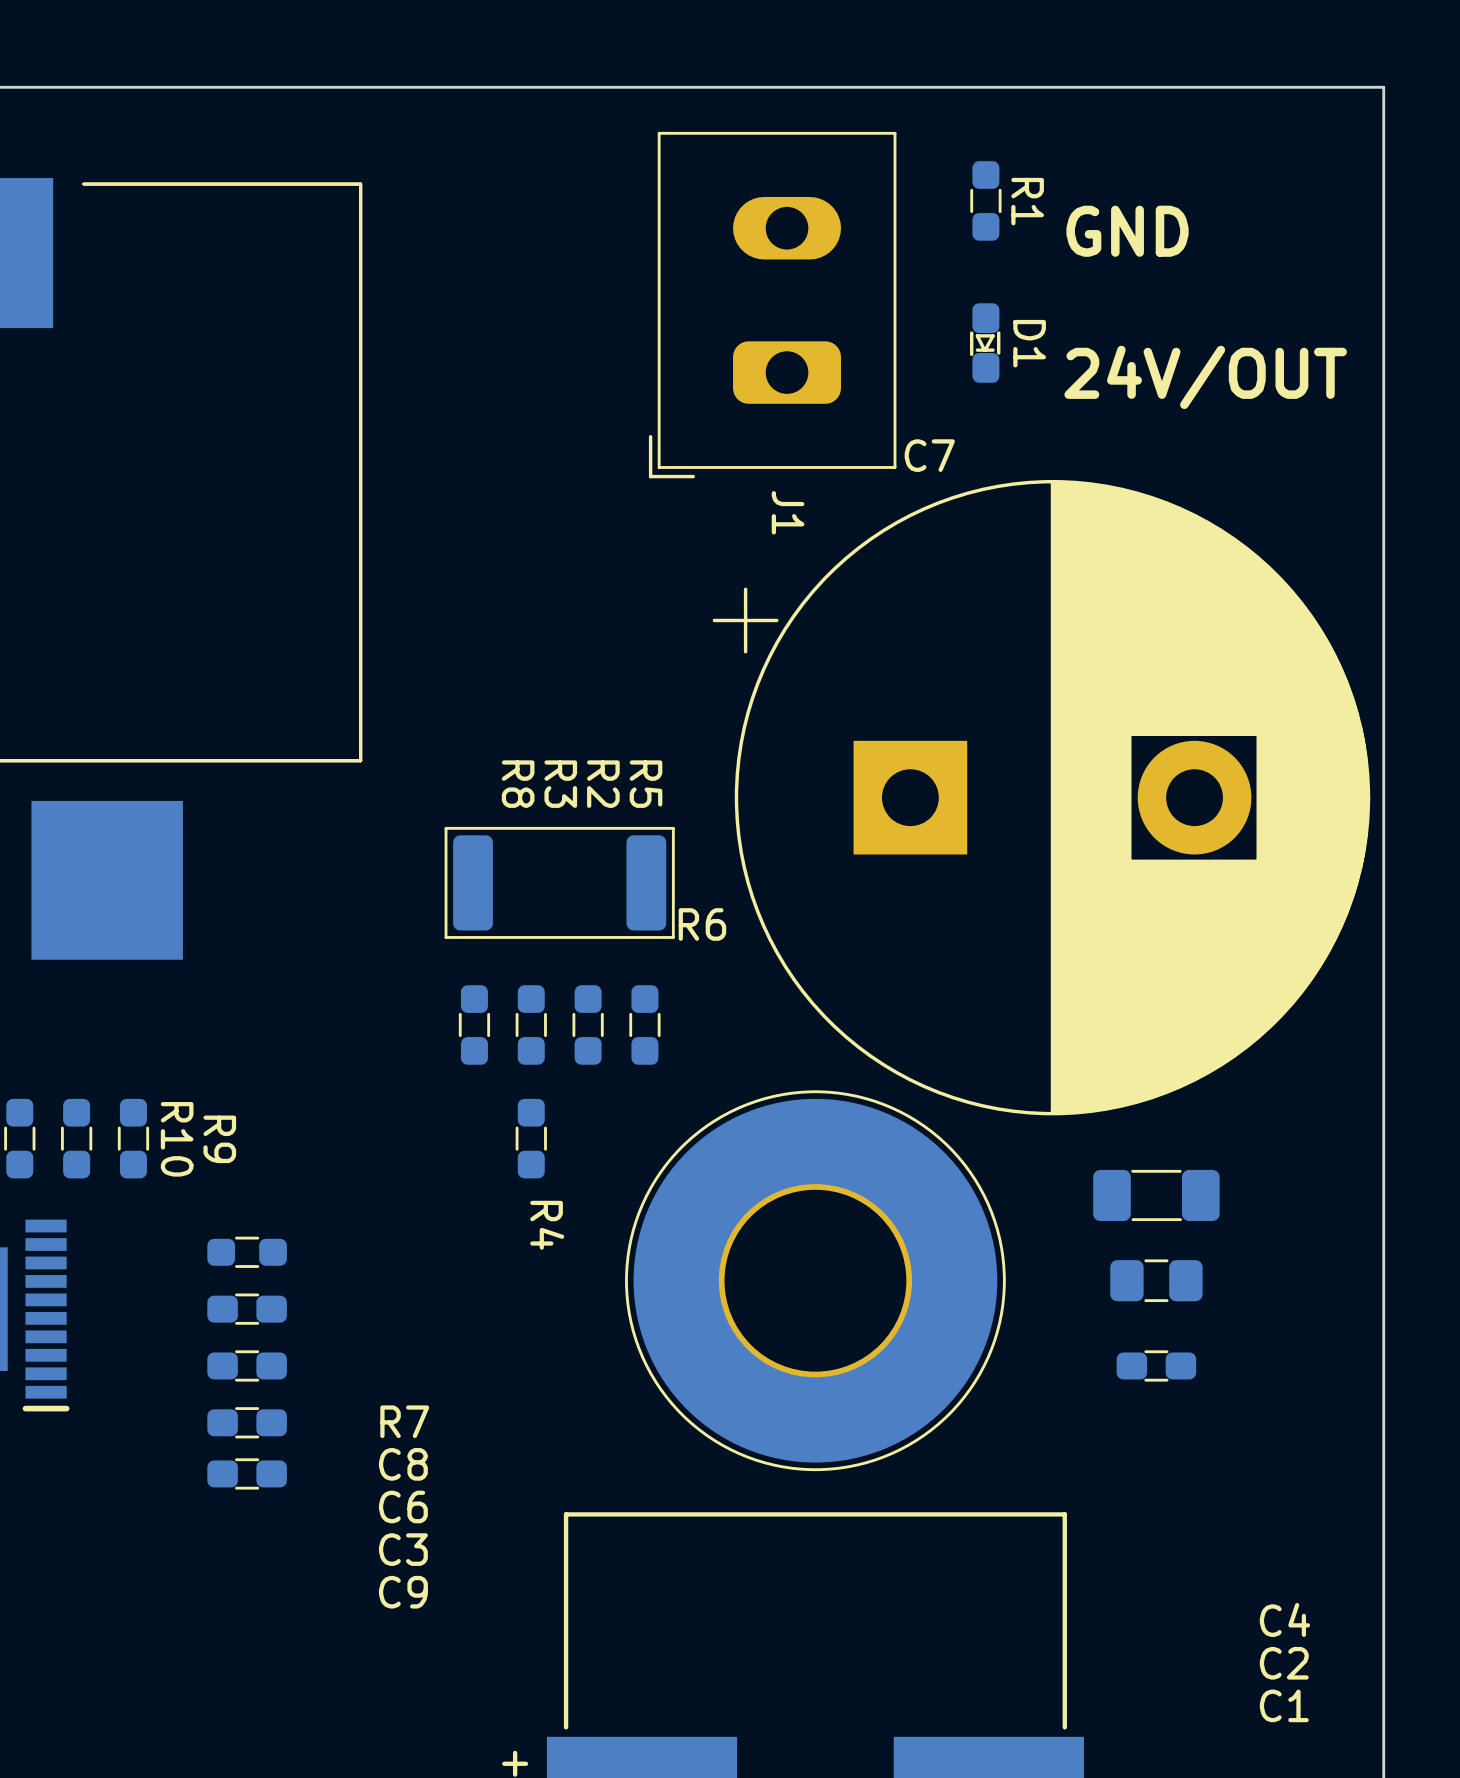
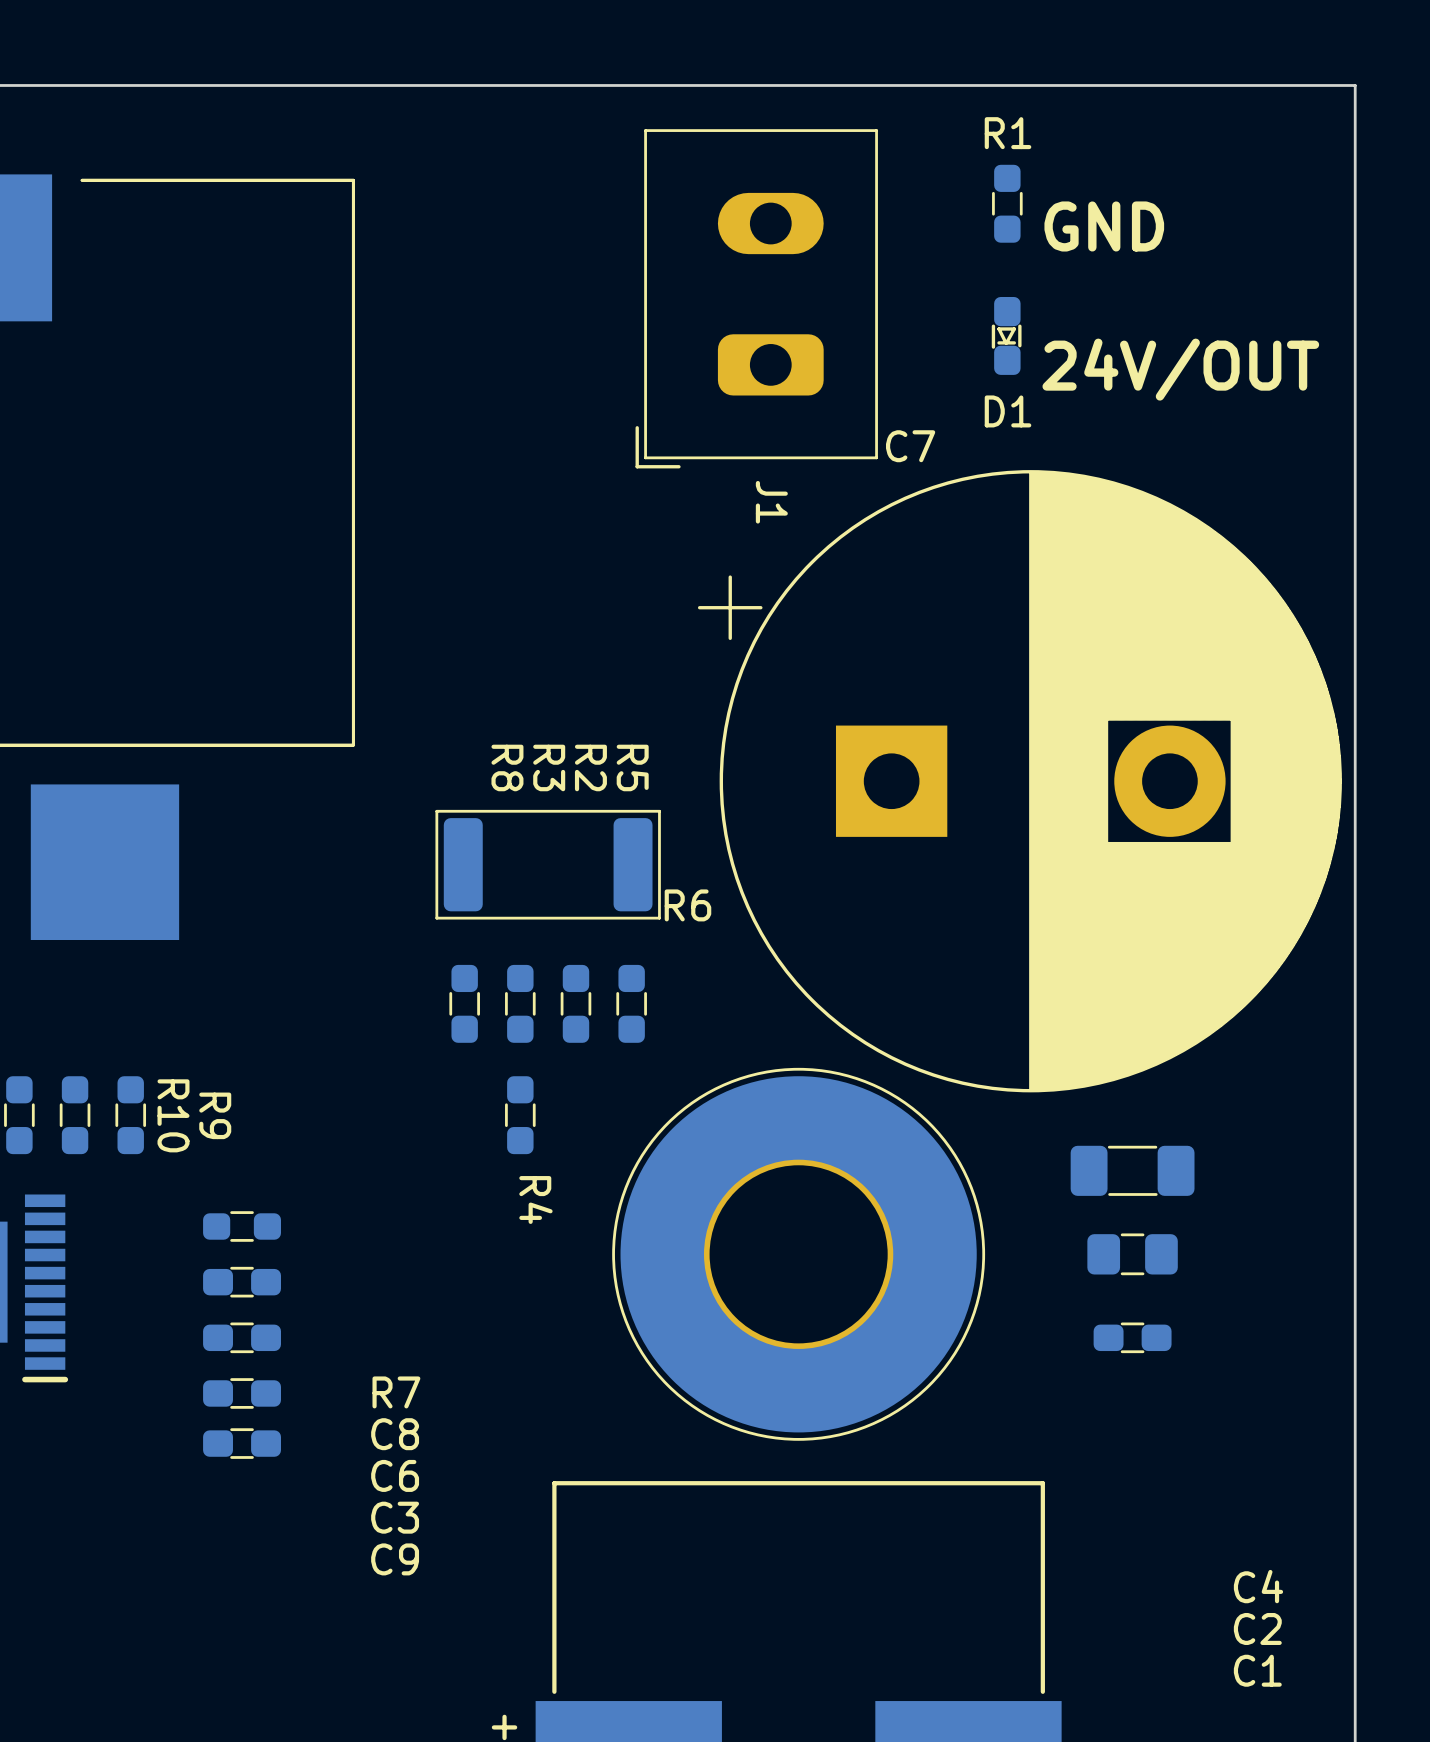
R1 position: (985, 200) -> (1007, 203)
R1 name rotation: 0° (1027, 201) -> 90° counterclockwise (1008, 133)
D1 position: (985, 343) -> (1006, 335)
D1 name rotation: 0° (1029, 343) -> 90° counterclockwise (1008, 411)
D1 name position: D1 (1029, 343) -> D1 (1008, 411)

